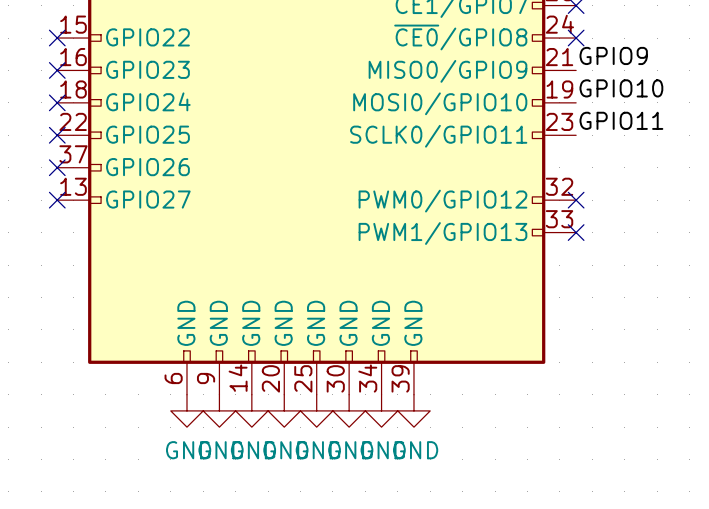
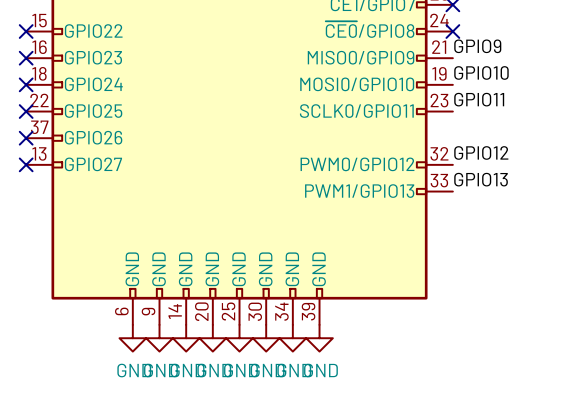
label: none -> GPIO12 (481, 152)
no-connect mark: (576, 200) -> none
label: none -> GPIO13 (481, 179)
no-connect mark: (576, 232) -> none

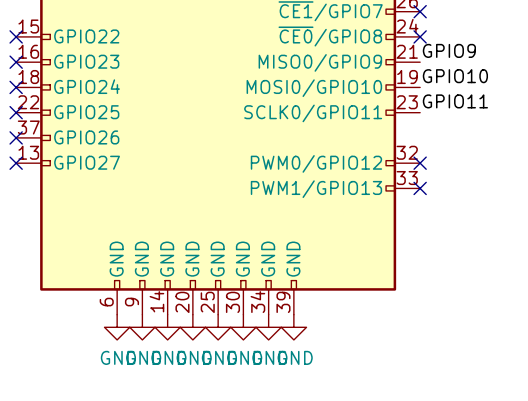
label: GPIO12 (481, 152) -> none
no-connect mark: none -> (420, 163)
label: GPIO13 (481, 179) -> none
no-connect mark: none -> (420, 188)

